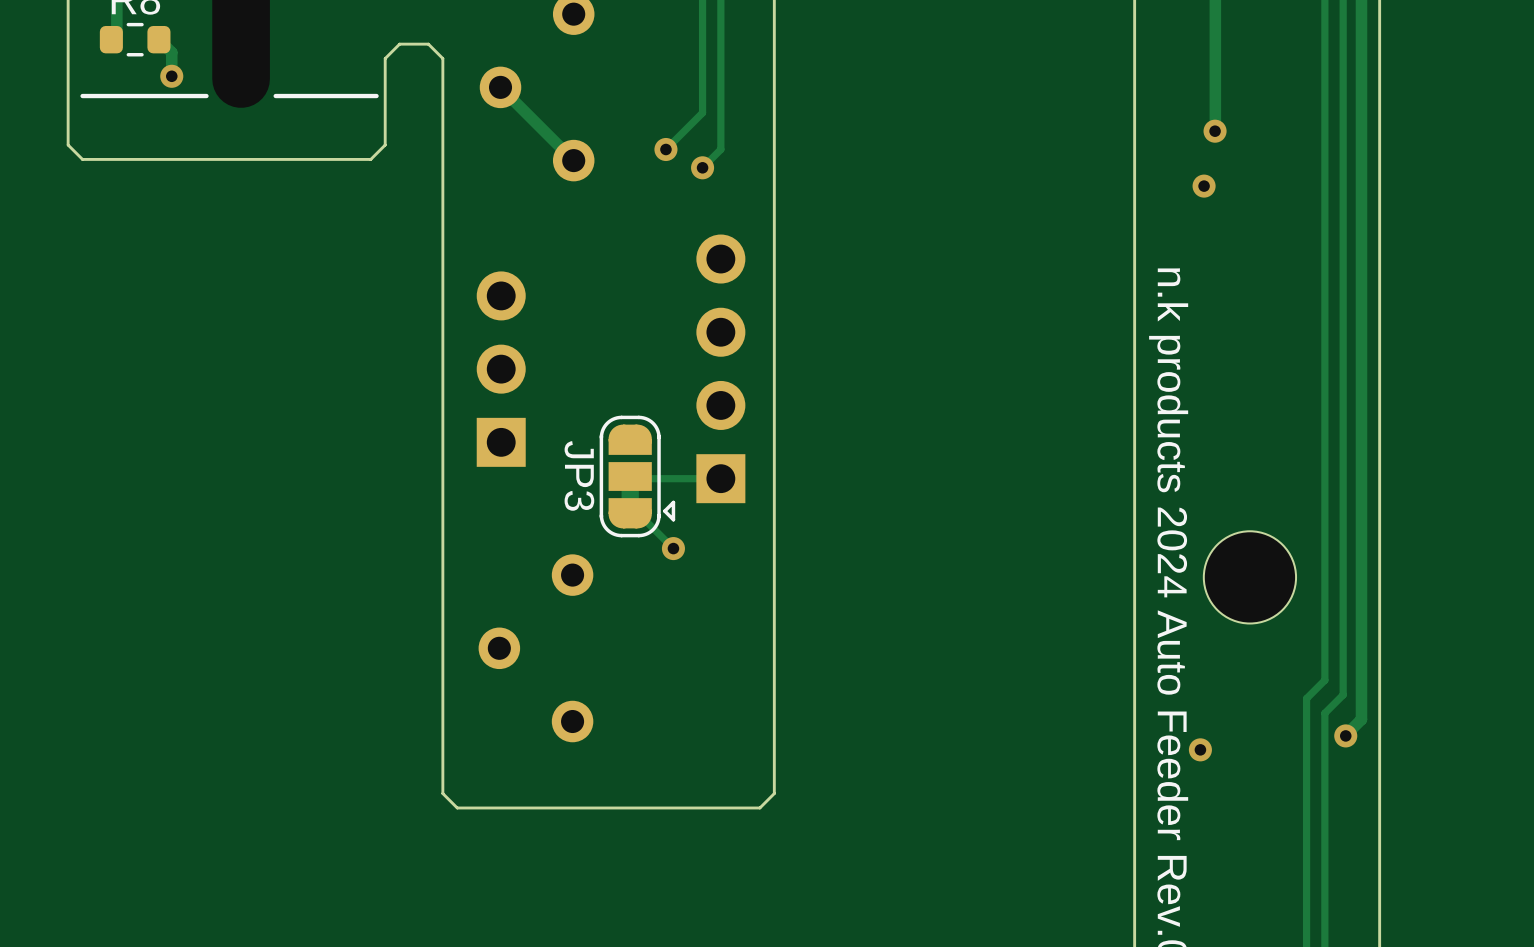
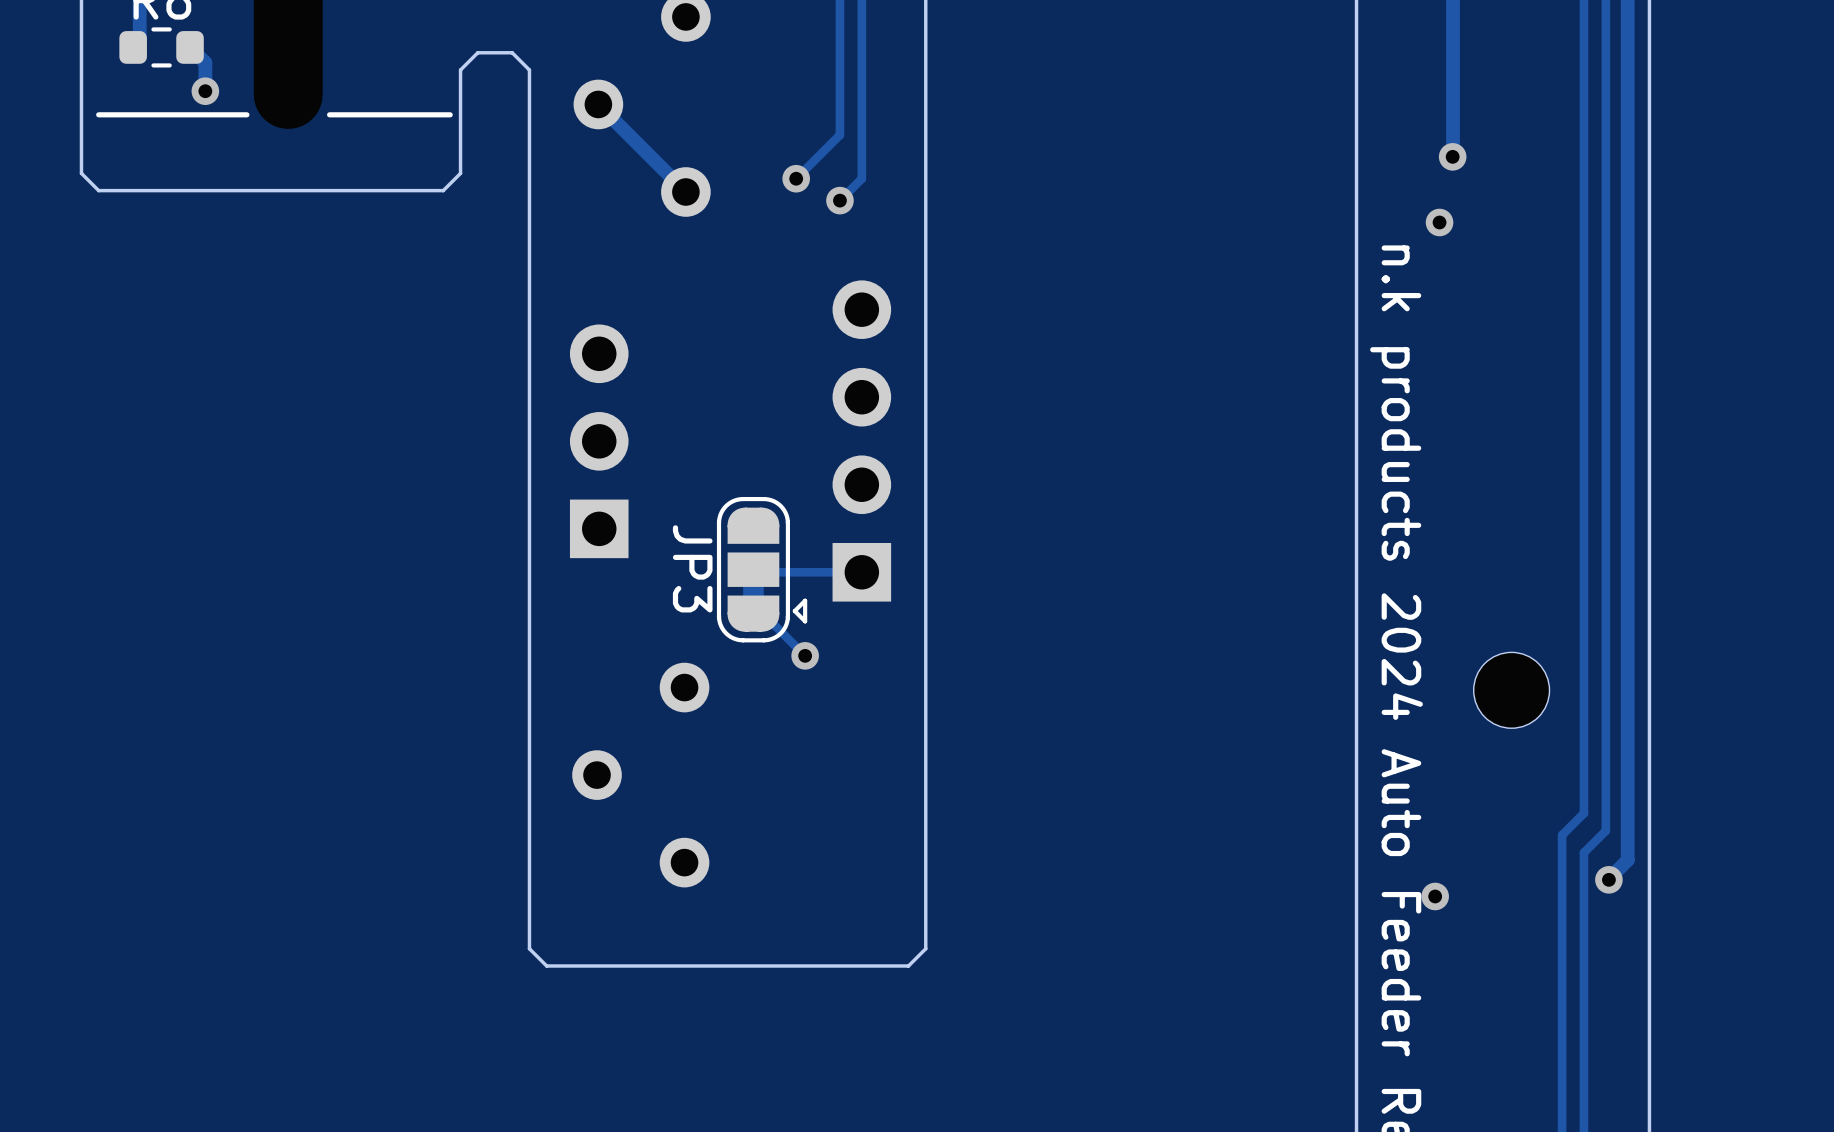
part footprint: [1203, 531, 1297, 624] -> [1473, 652, 1550, 729]

